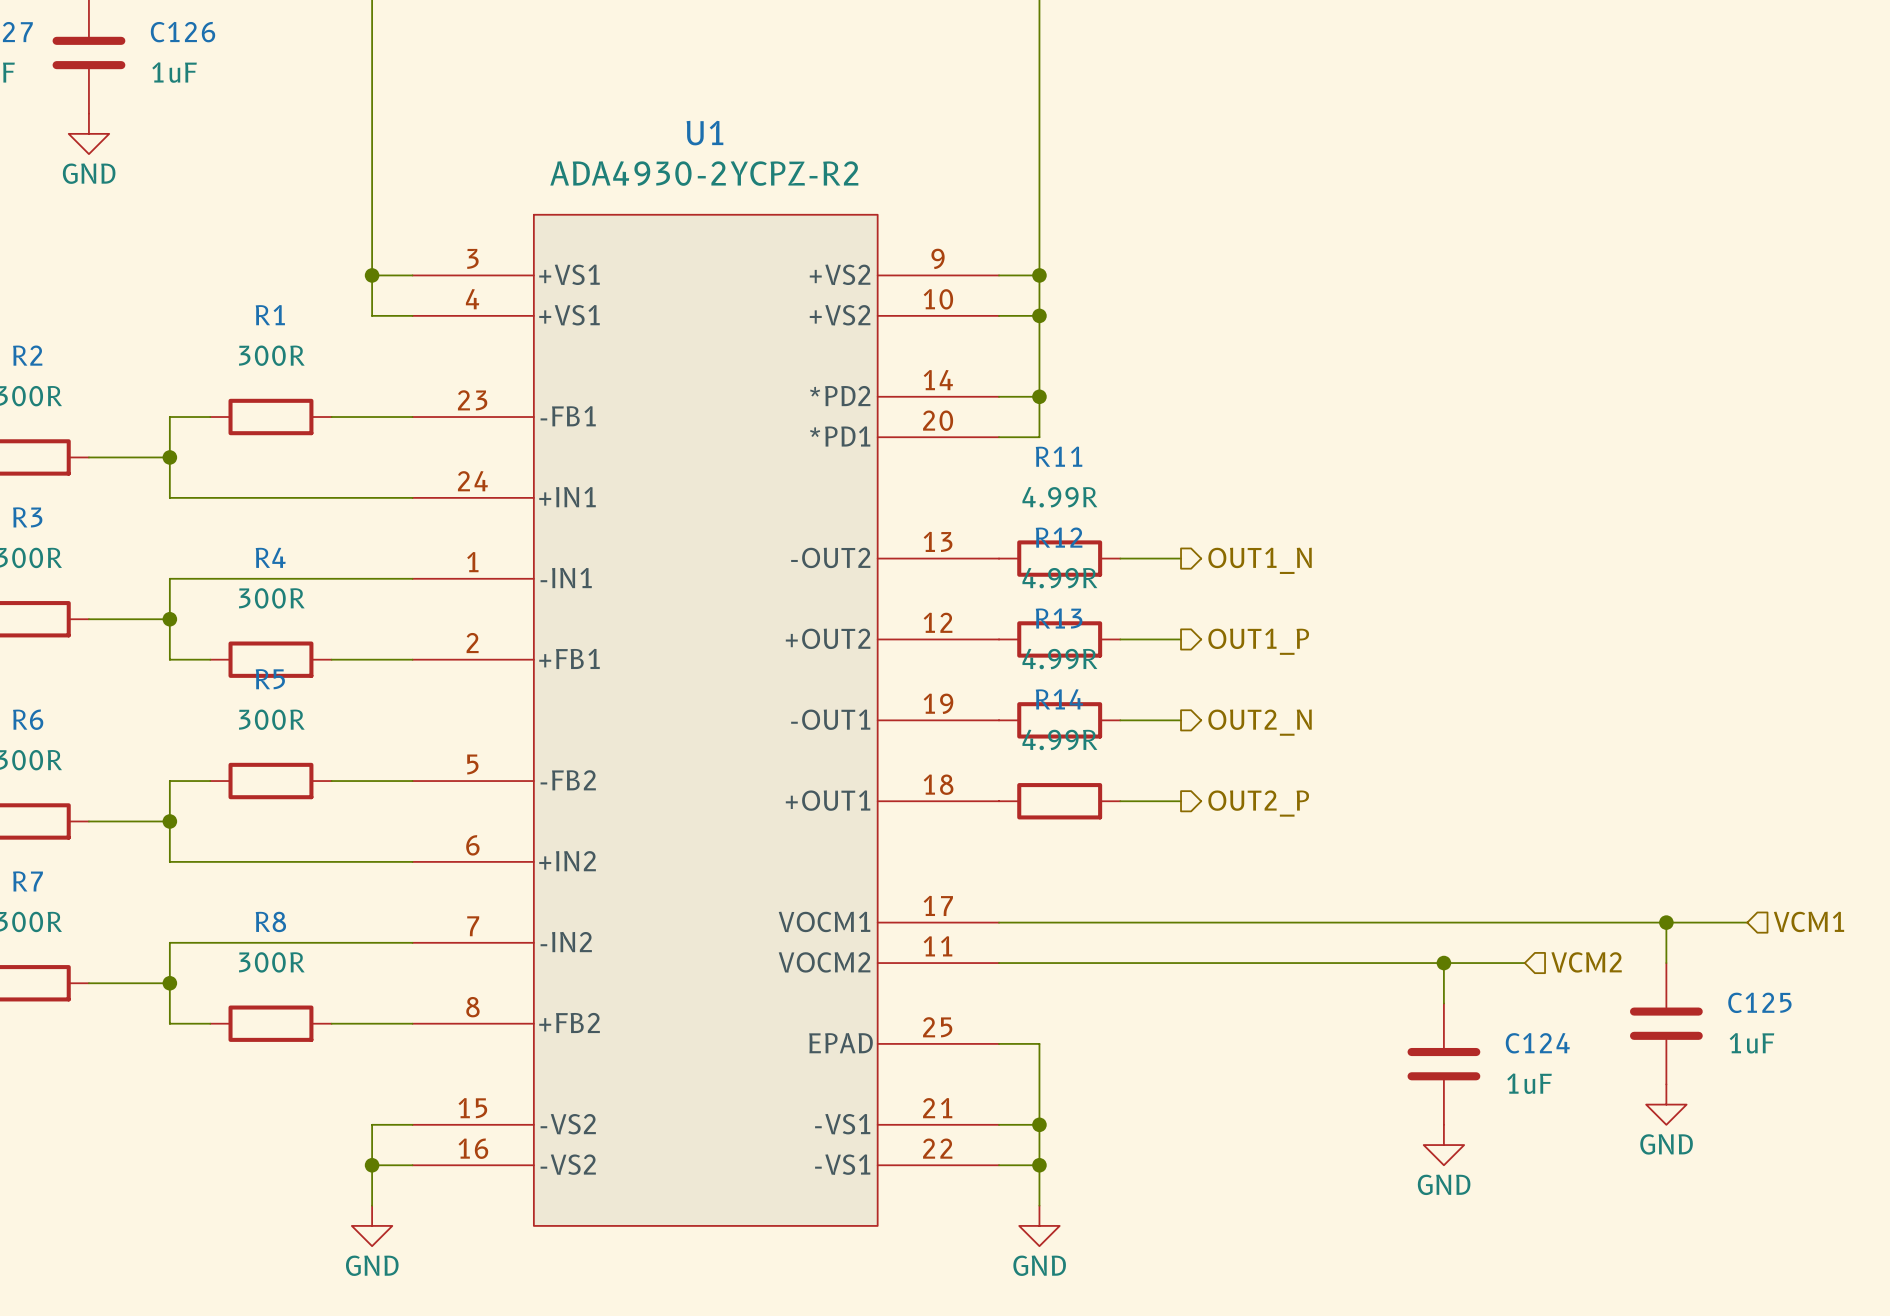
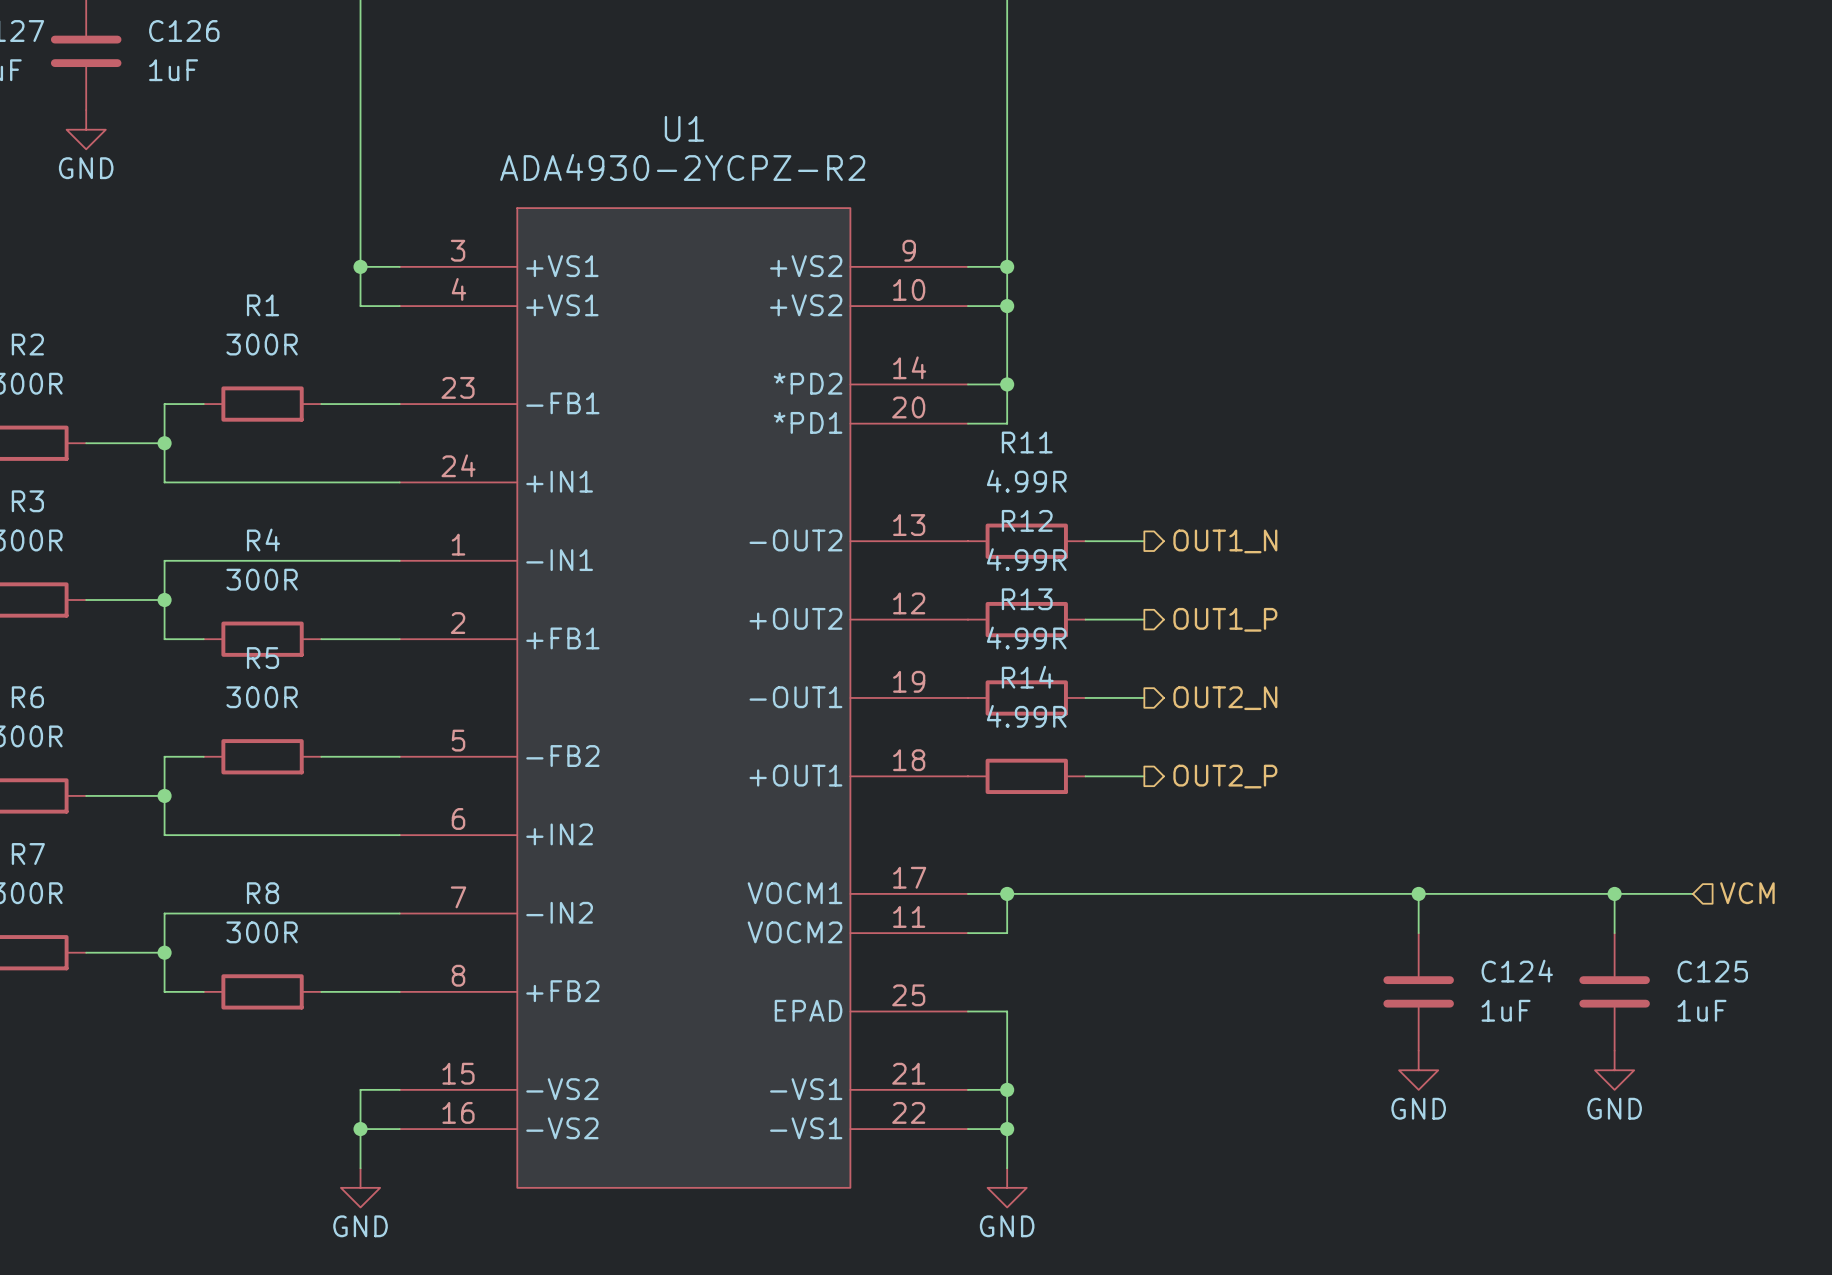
hierarchical label: VCM1 (1808, 921) -> VCM (1747, 893)
junction: none -> (1007, 893)
hierarchical label: VCM2 (1586, 962) -> none
wire: (1039, 963) (1524, 963) -> (1007, 933) (1007, 893)
wire: (1443, 963) (1443, 1003) -> (1418, 893) (1418, 933)
junction position: (1443, 963) -> (1418, 893)
C124 position: (1443, 1064) -> (1418, 991)
power symbol position: GND (1443, 1145) -> GND (1418, 1070)

